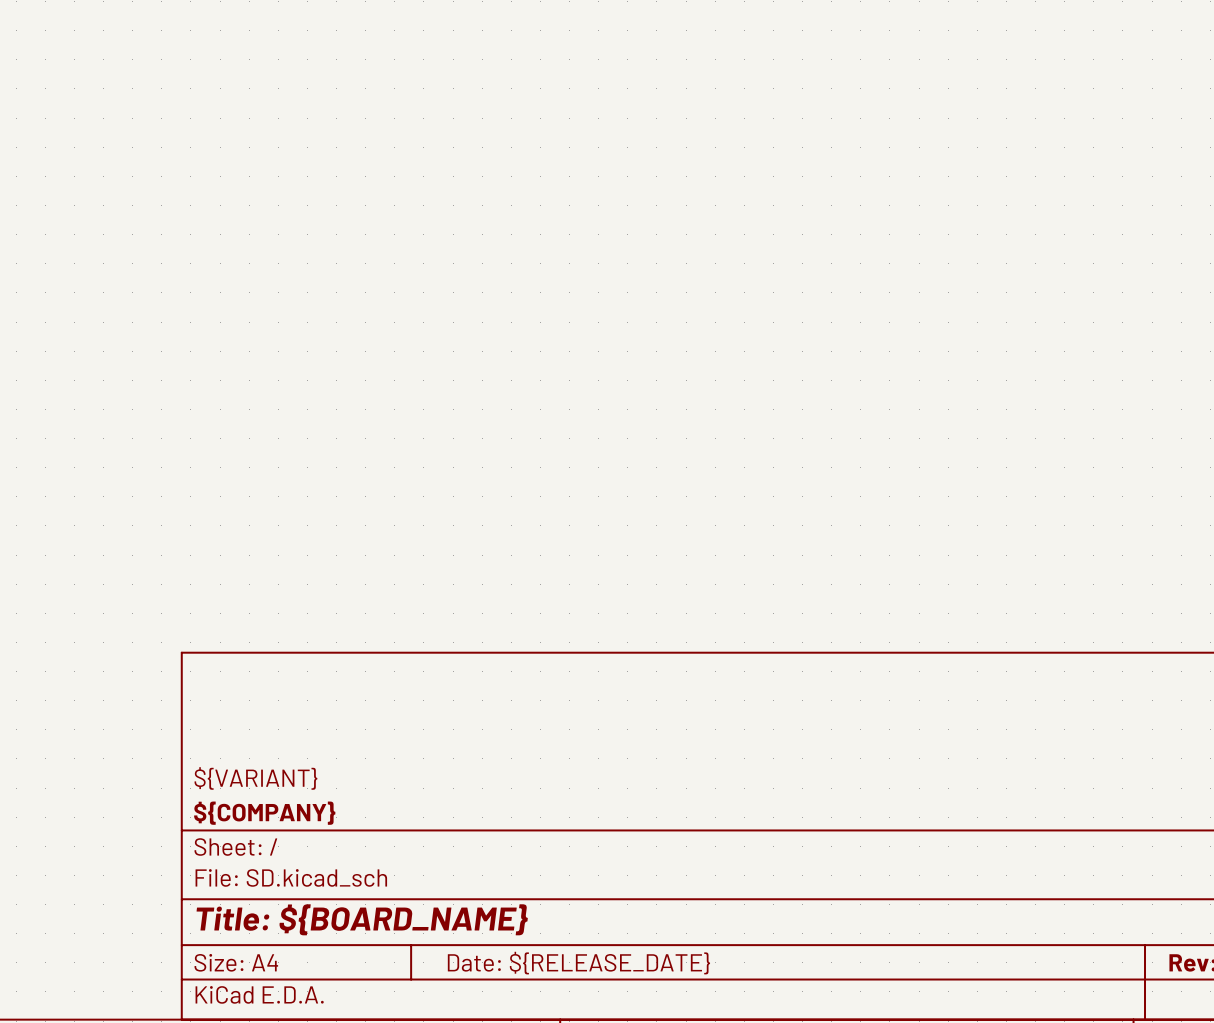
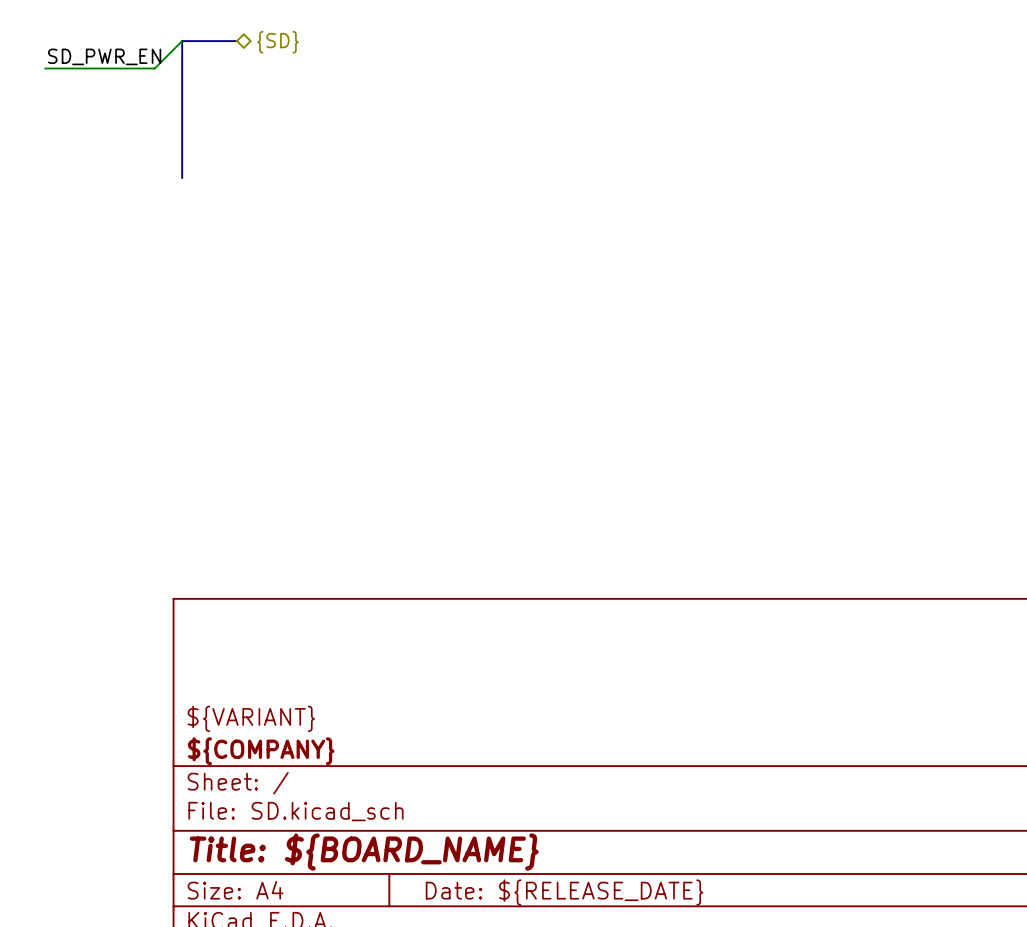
wire: none -> (182, 41) (154, 68) (45, 68)
bus: none -> (236, 41) (182, 41) (182, 178)
hierarchical label: none -> {SD} (277, 42)
label: none -> SD_PWR_EN (104, 56)

